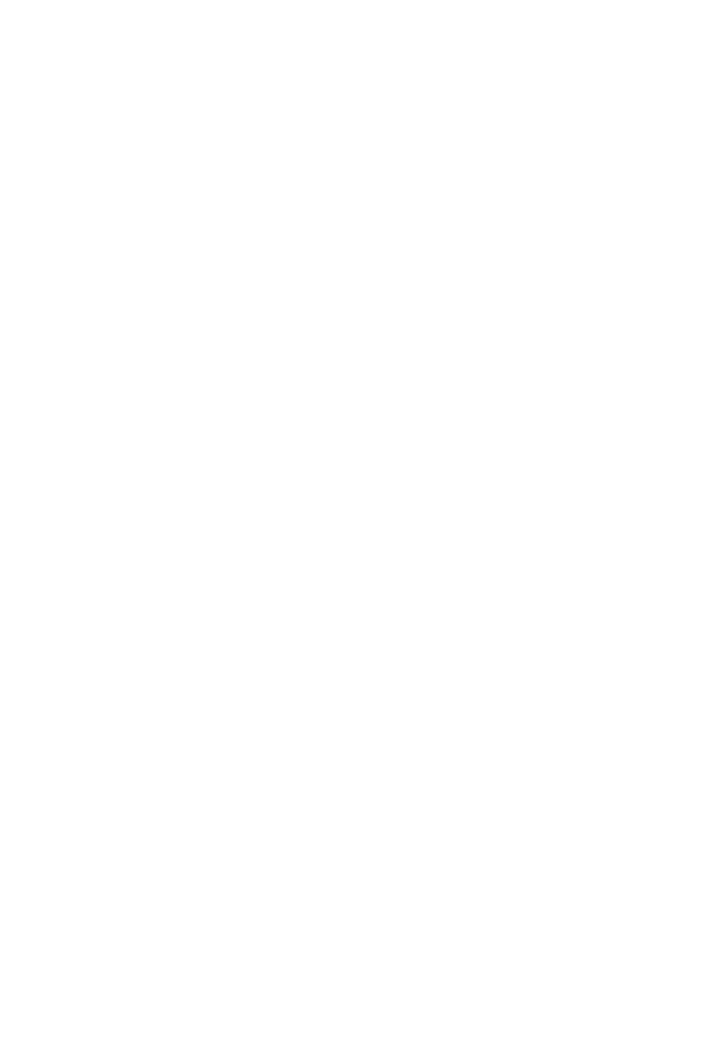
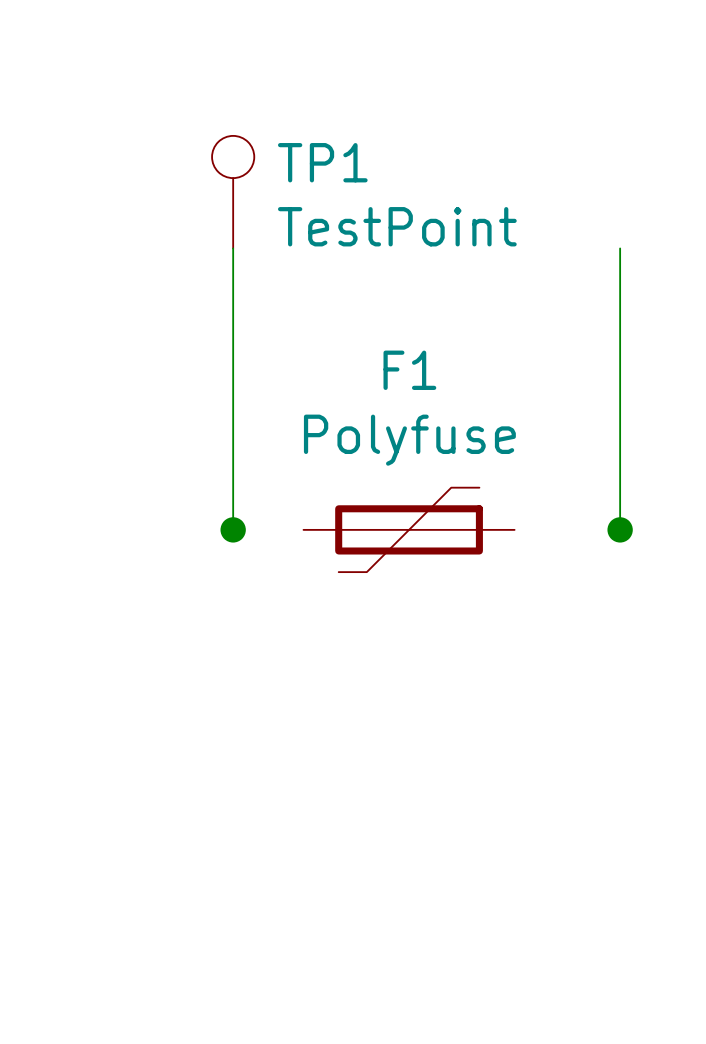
TP1: none -> TestPoint (233, 192)
wire: none -> (233, 248) (233, 529)
wire: none -> (620, 248) (620, 529)
junction: none -> (233, 529)
F1: none -> Polyfuse (409, 529)
junction: none -> (620, 529)

